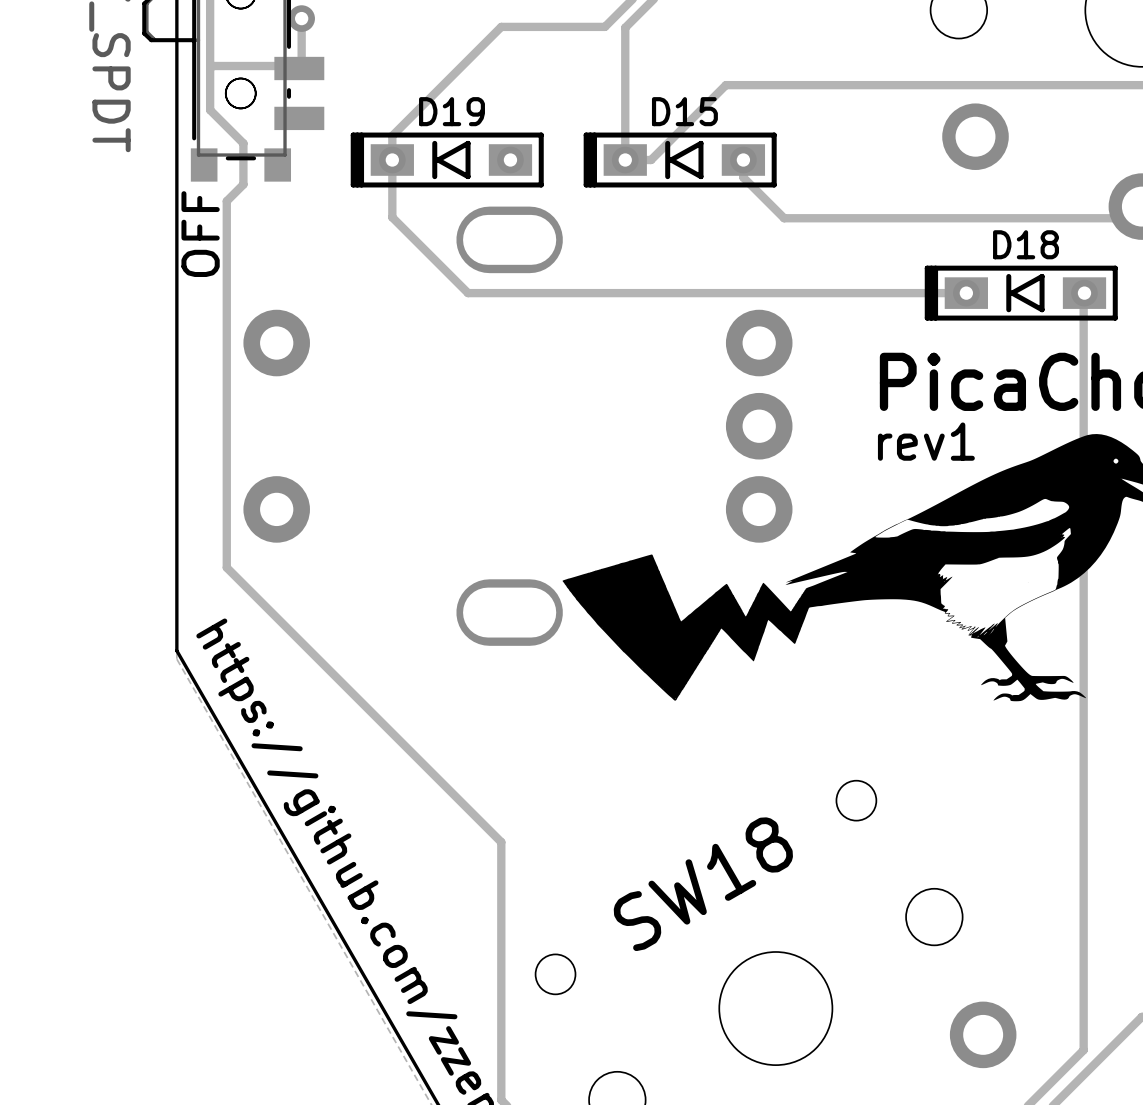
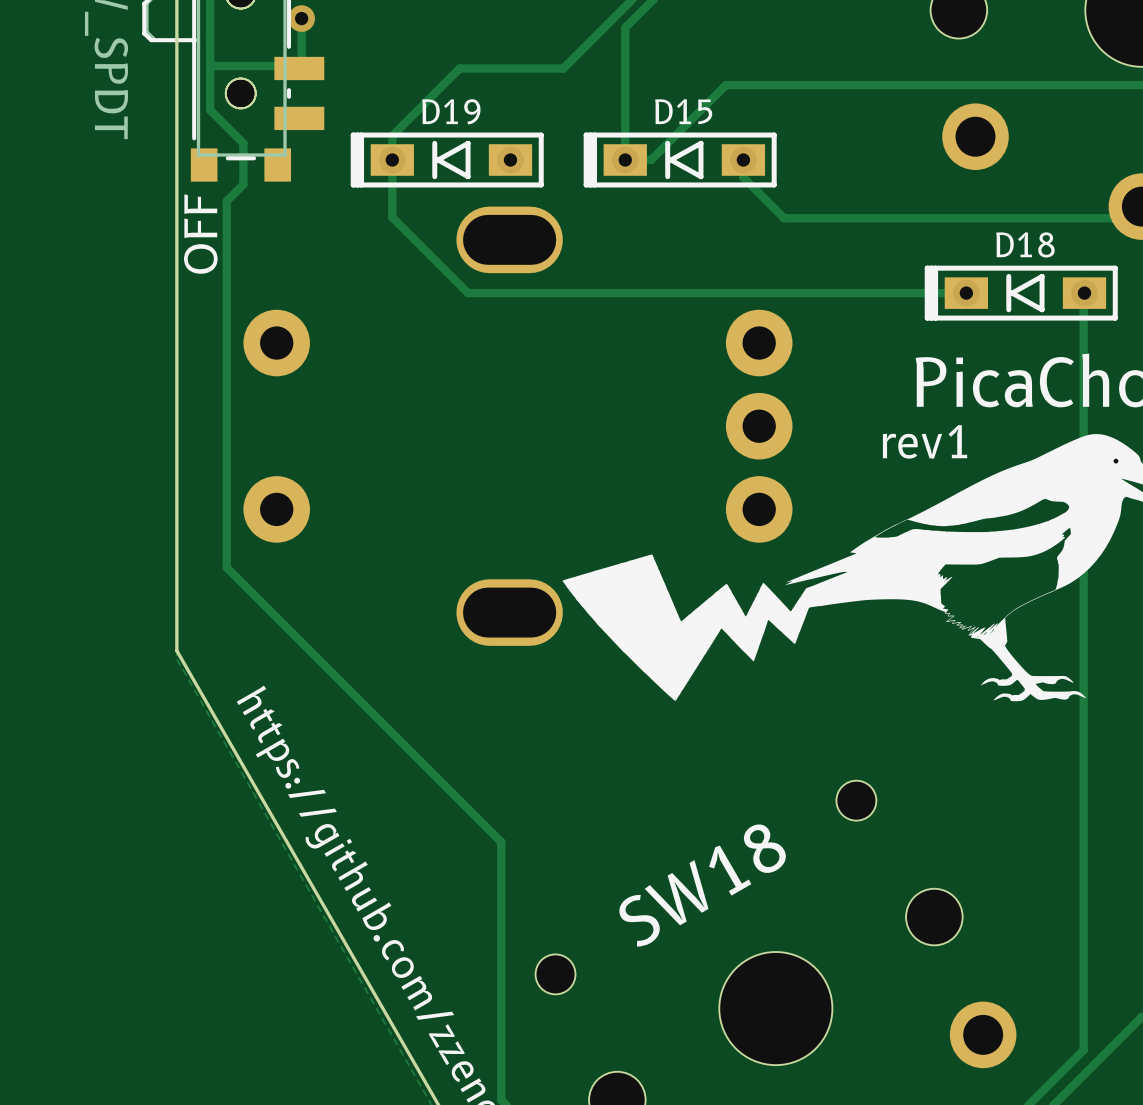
track: (604, 26) (501, 26) (459, 68) -> (604, 26) (563, 68) (459, 68)

